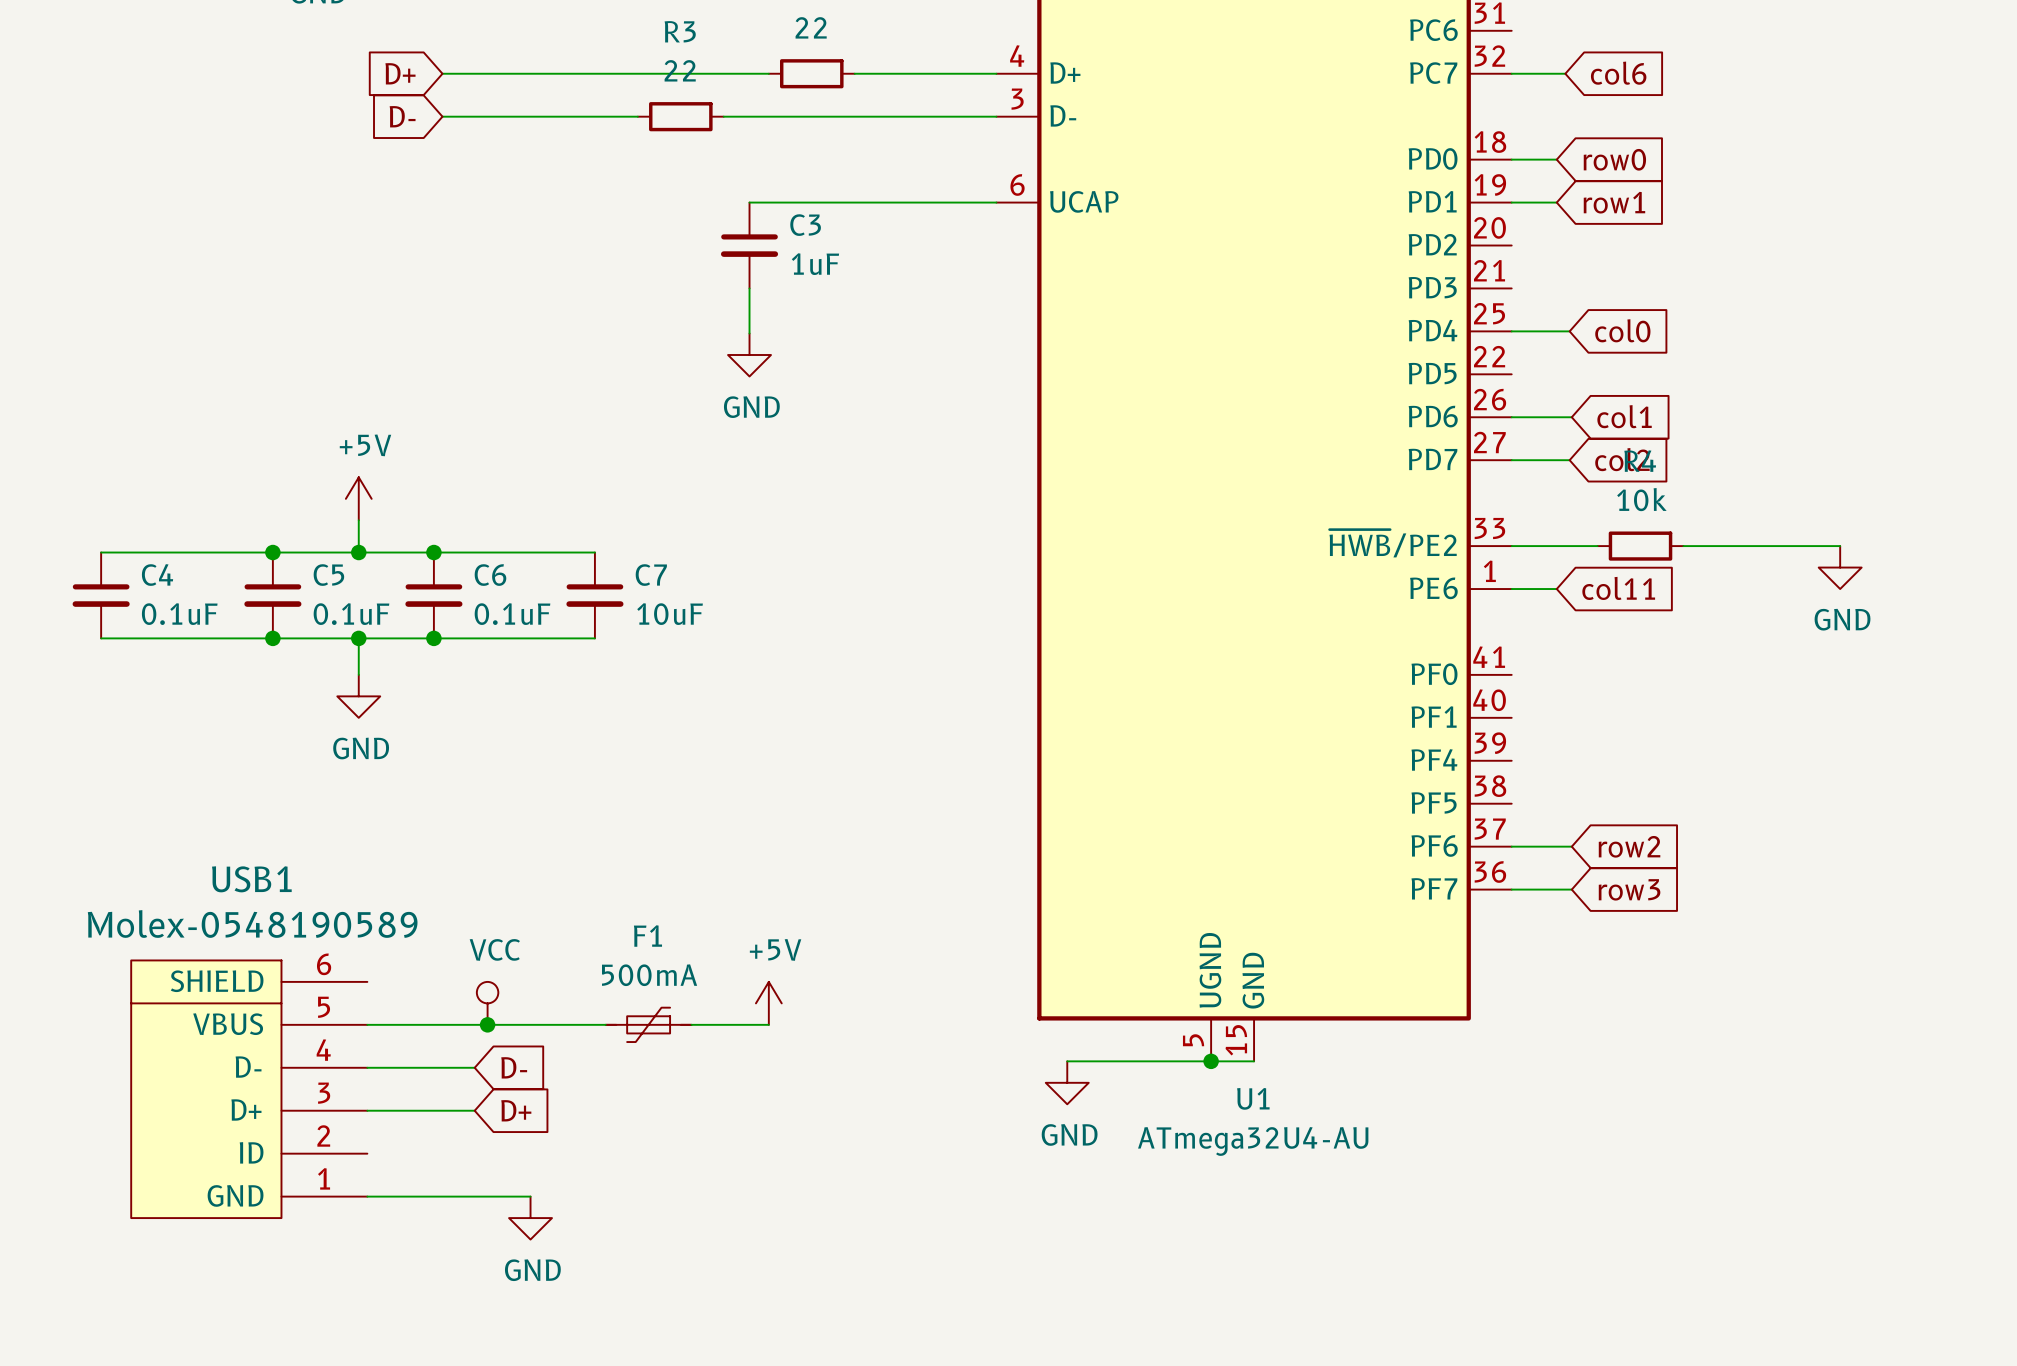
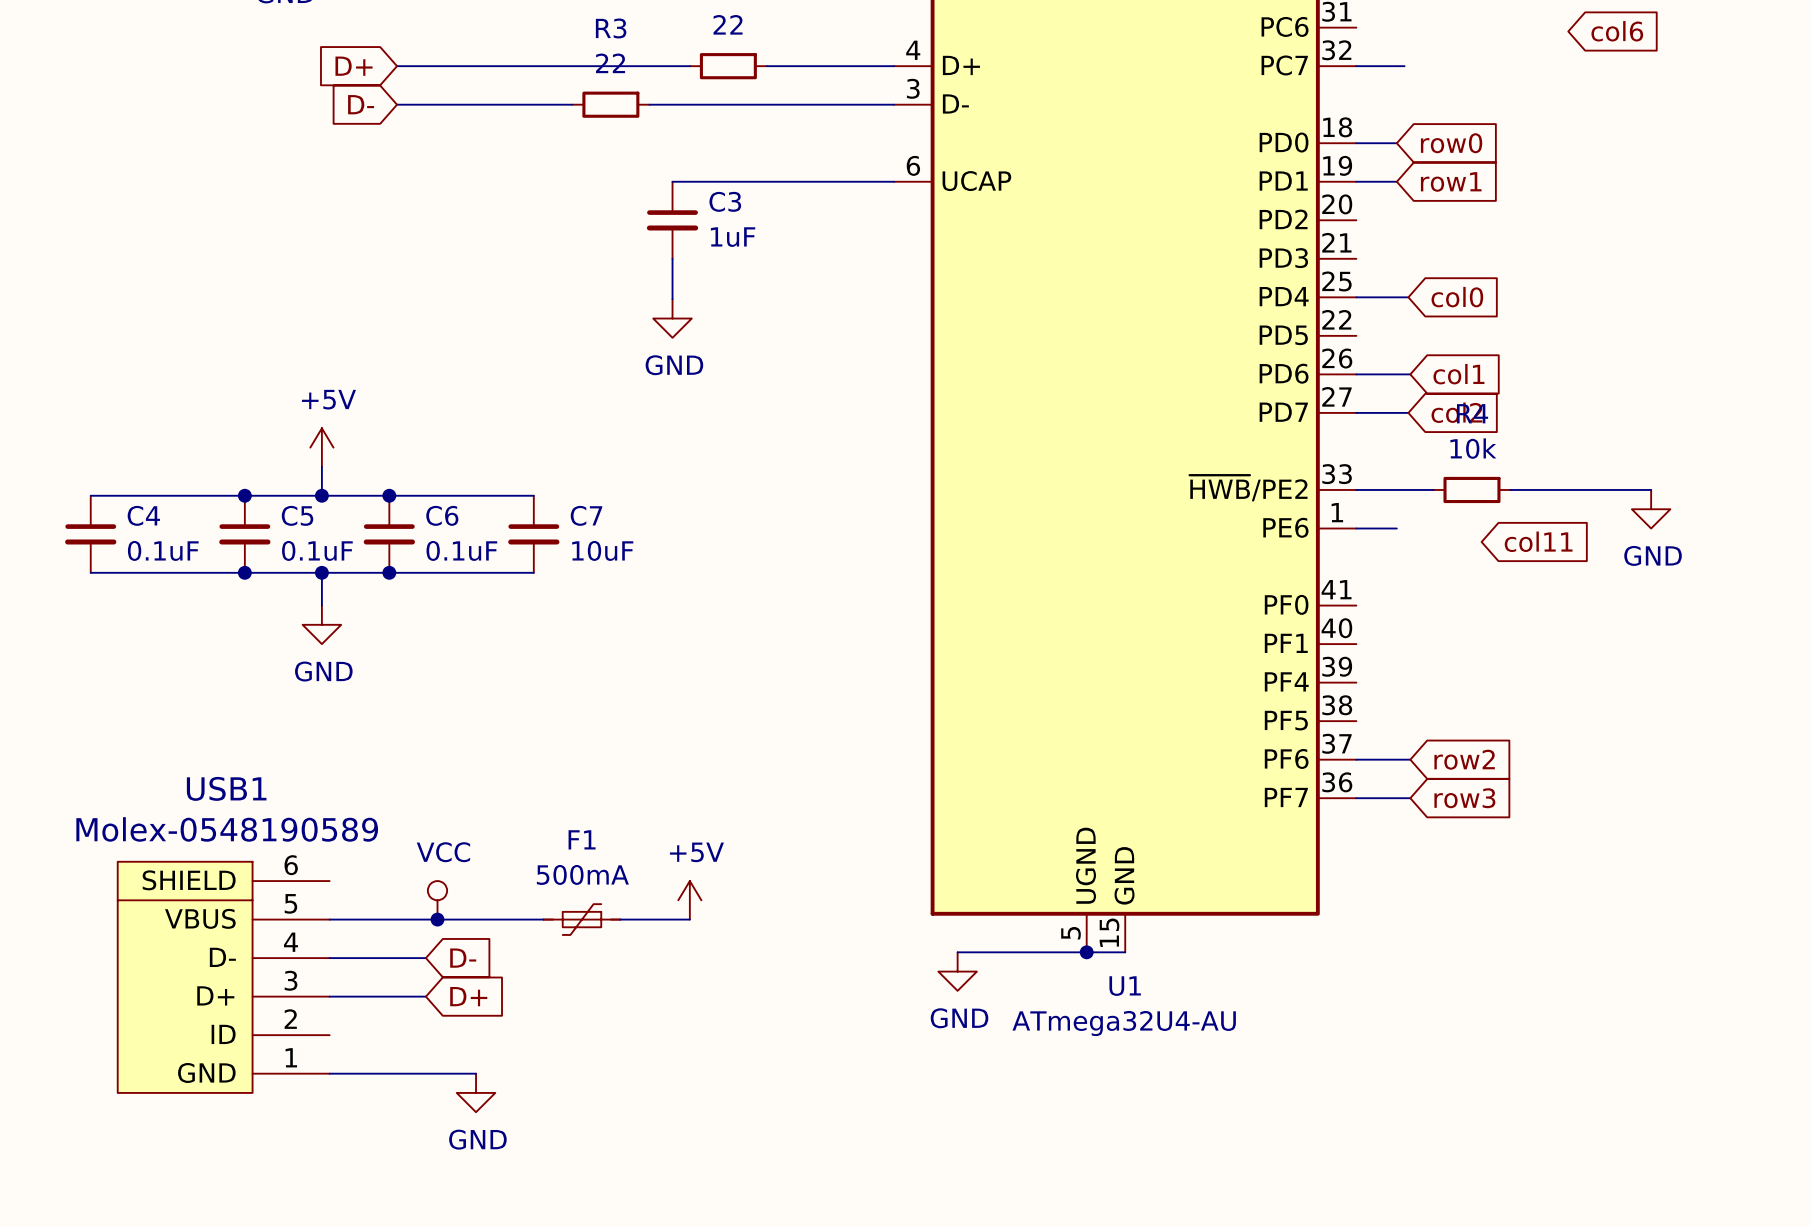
global label position: col6 (1618, 73) -> col6 (1617, 31)
global label position: col11 (1618, 588) -> col11 (1538, 541)

